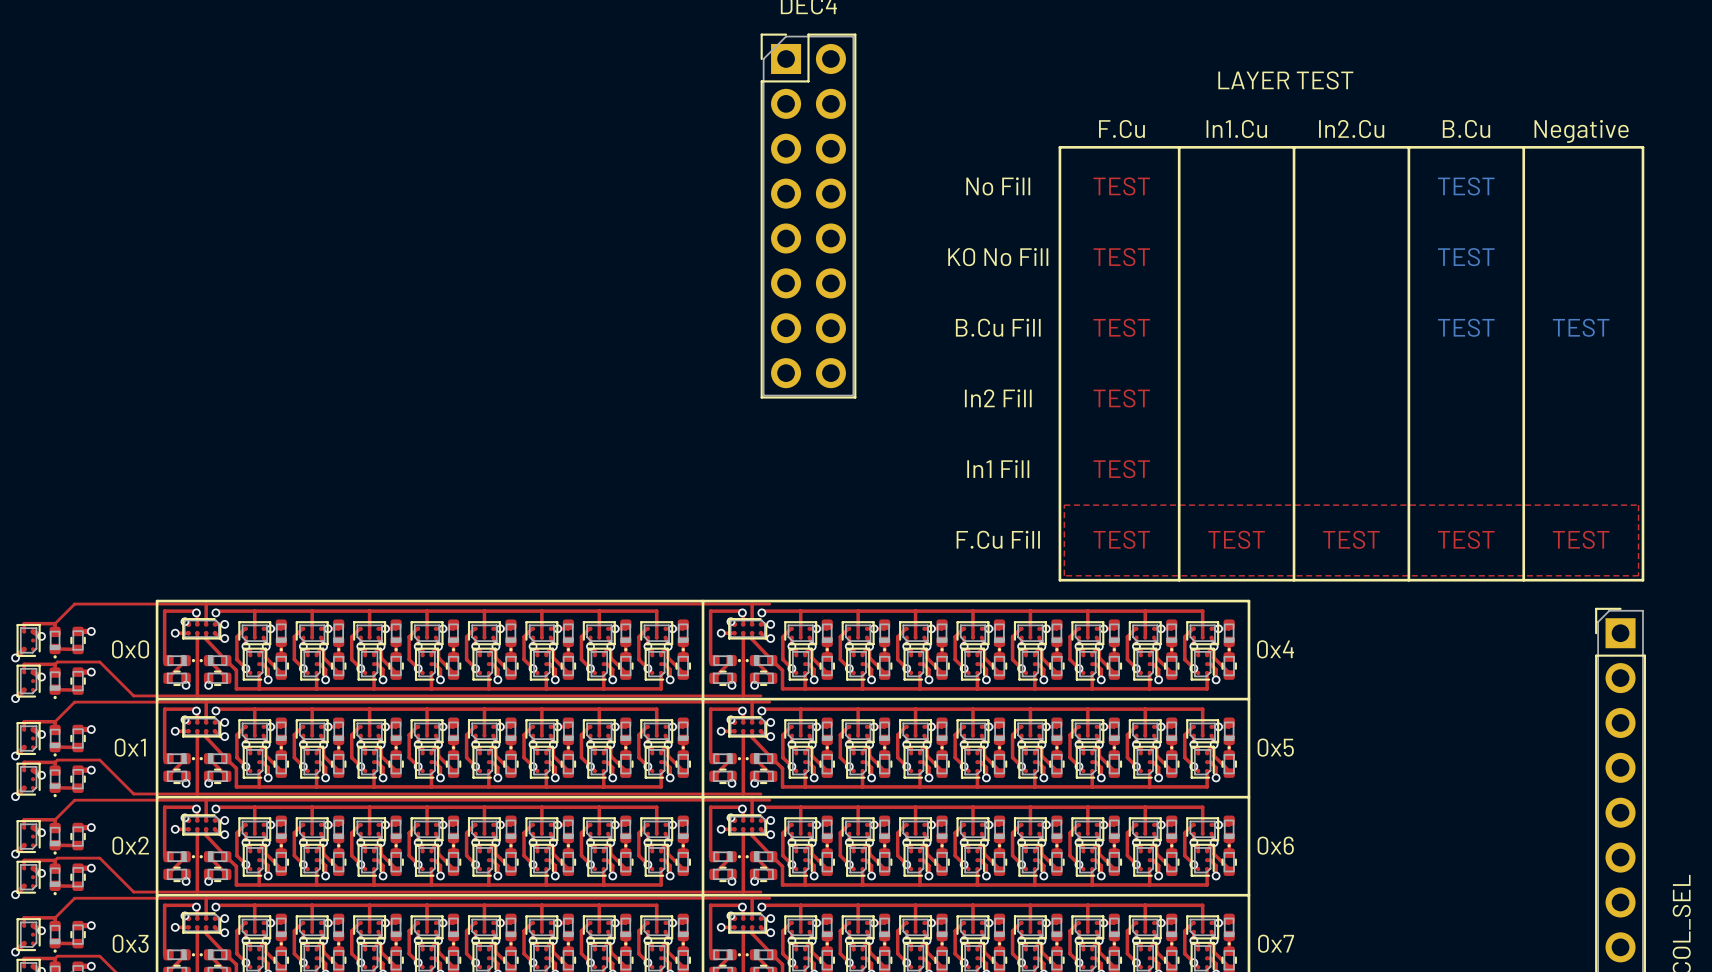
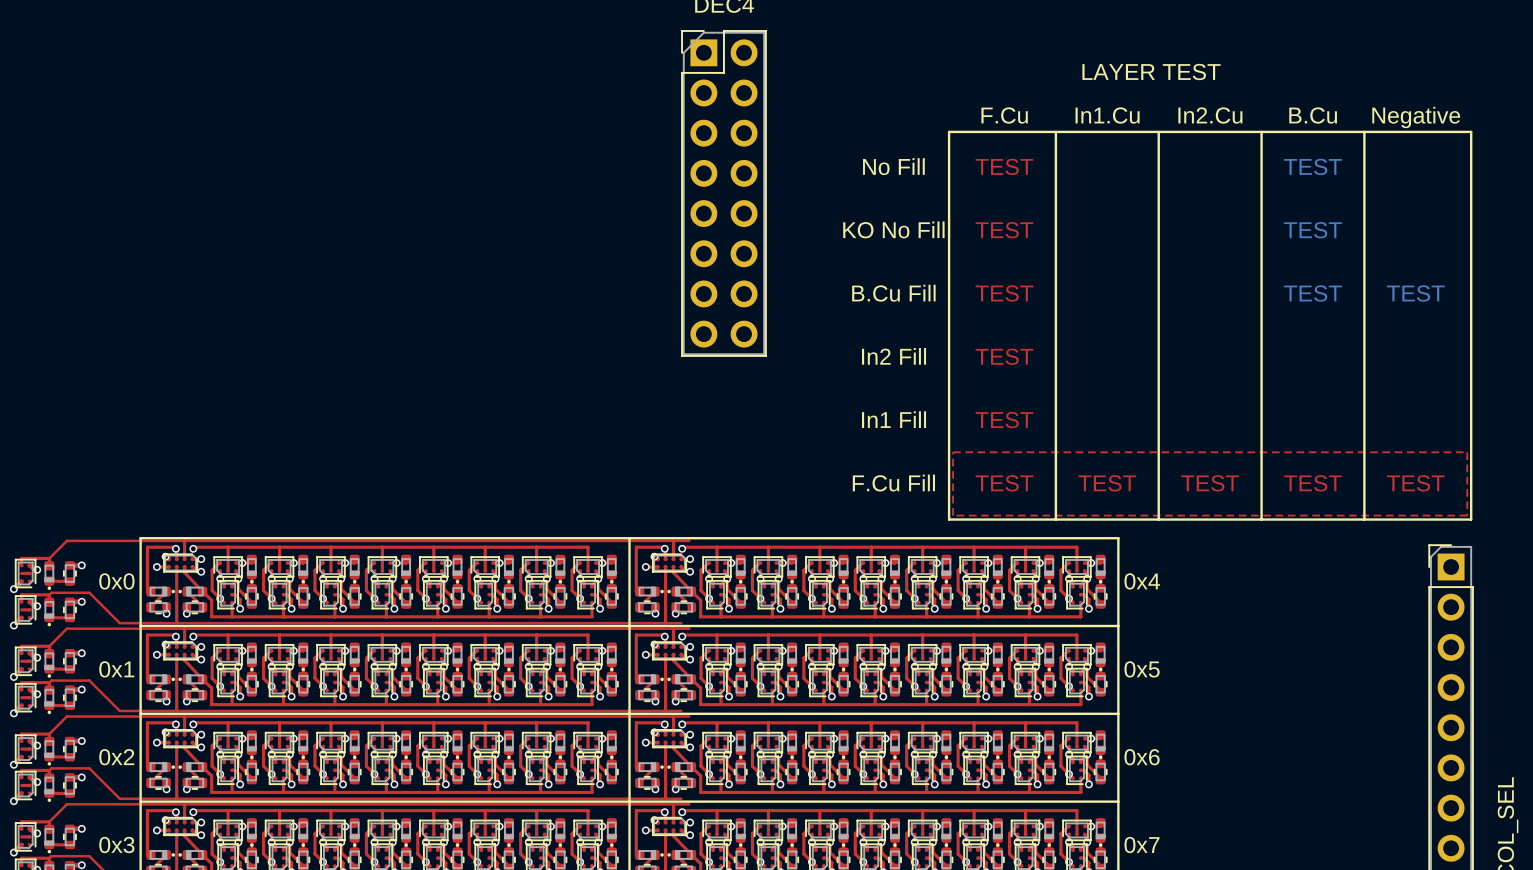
top track: none -> (21, 573) (29, 573)
top track: none -> (21, 609) (29, 609)
top track: none -> (21, 661) (29, 661)
top track: none -> (21, 697) (29, 697)
top track: none -> (21, 749) (29, 749)
top track: none -> (21, 785) (29, 785)
top track: none -> (21, 836) (29, 836)

